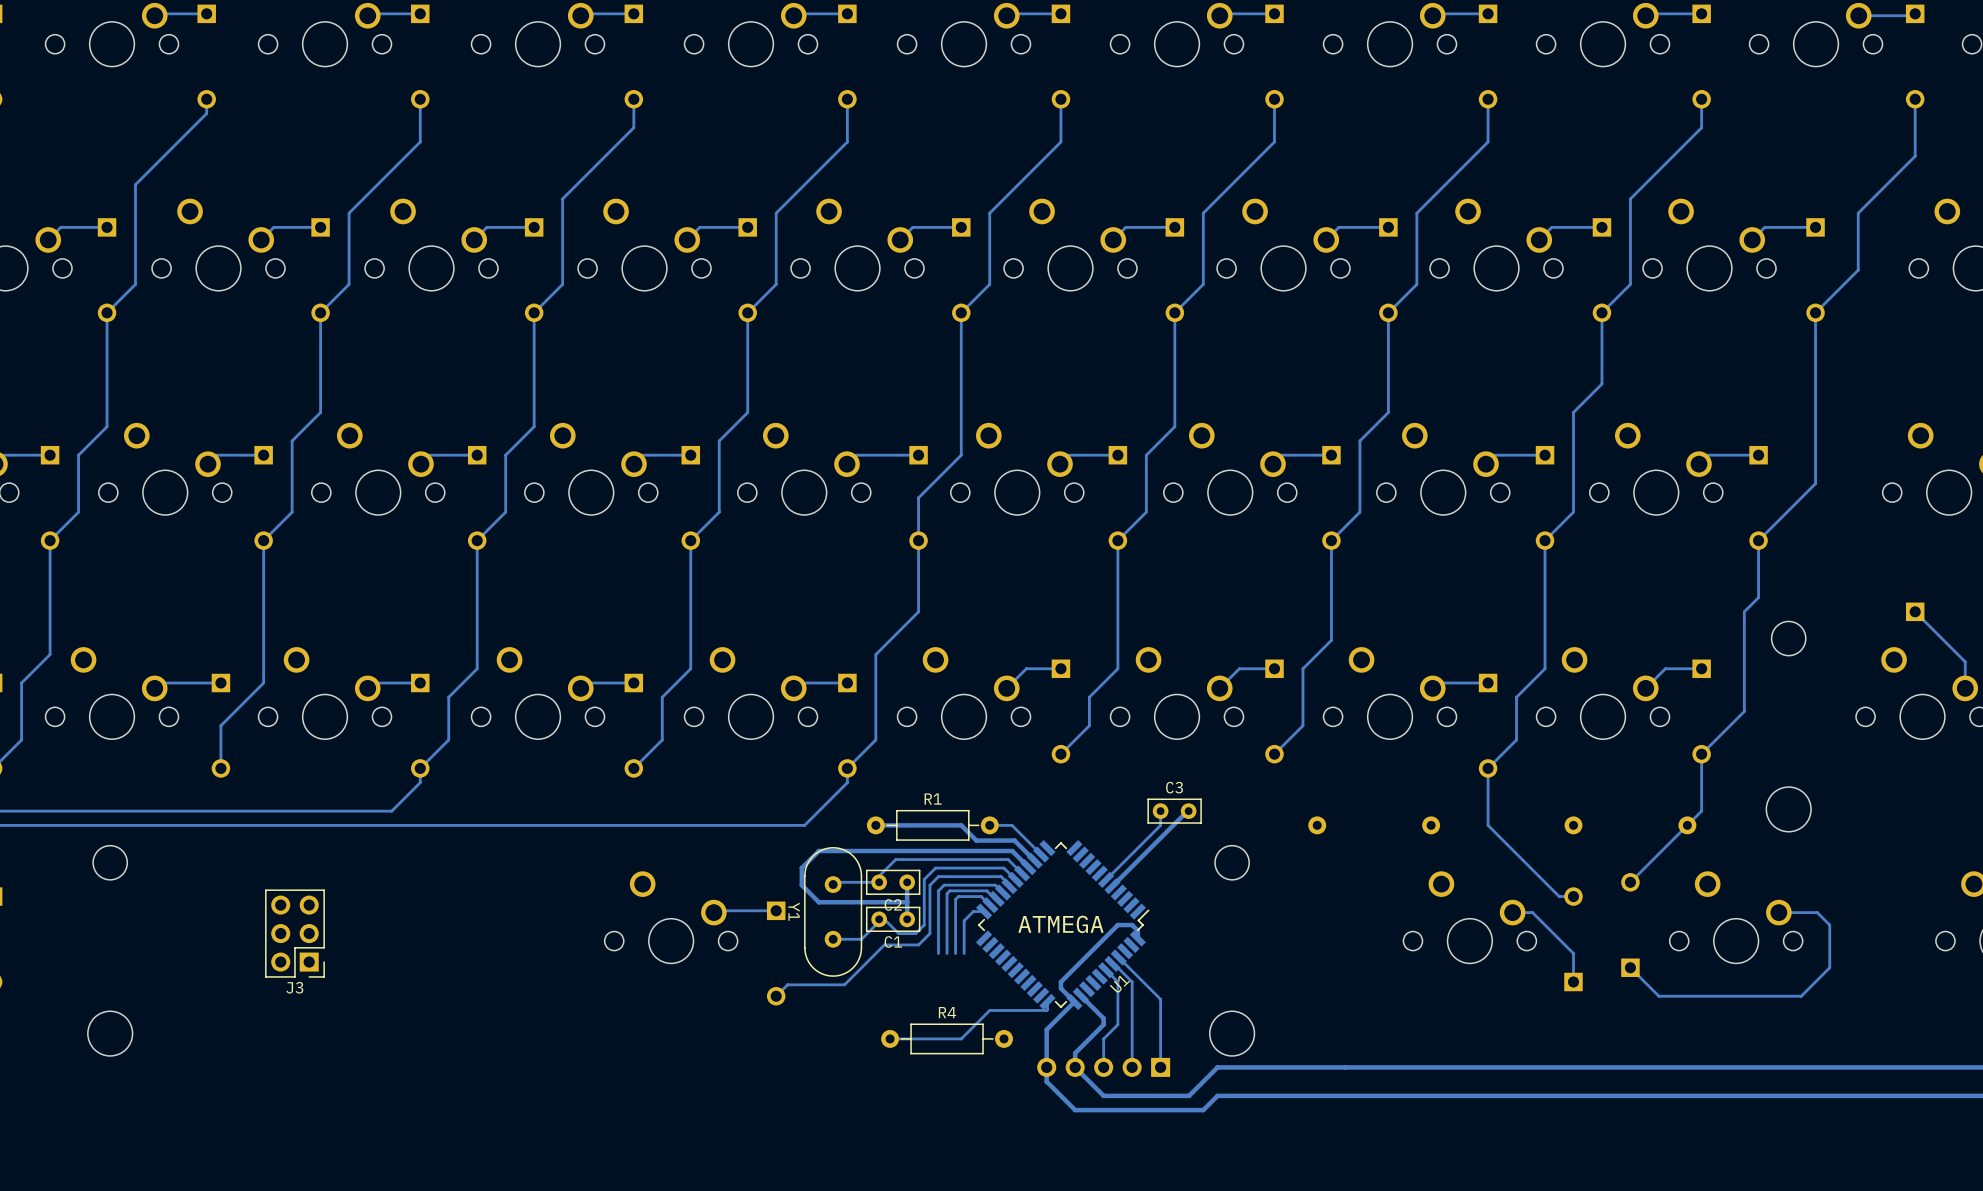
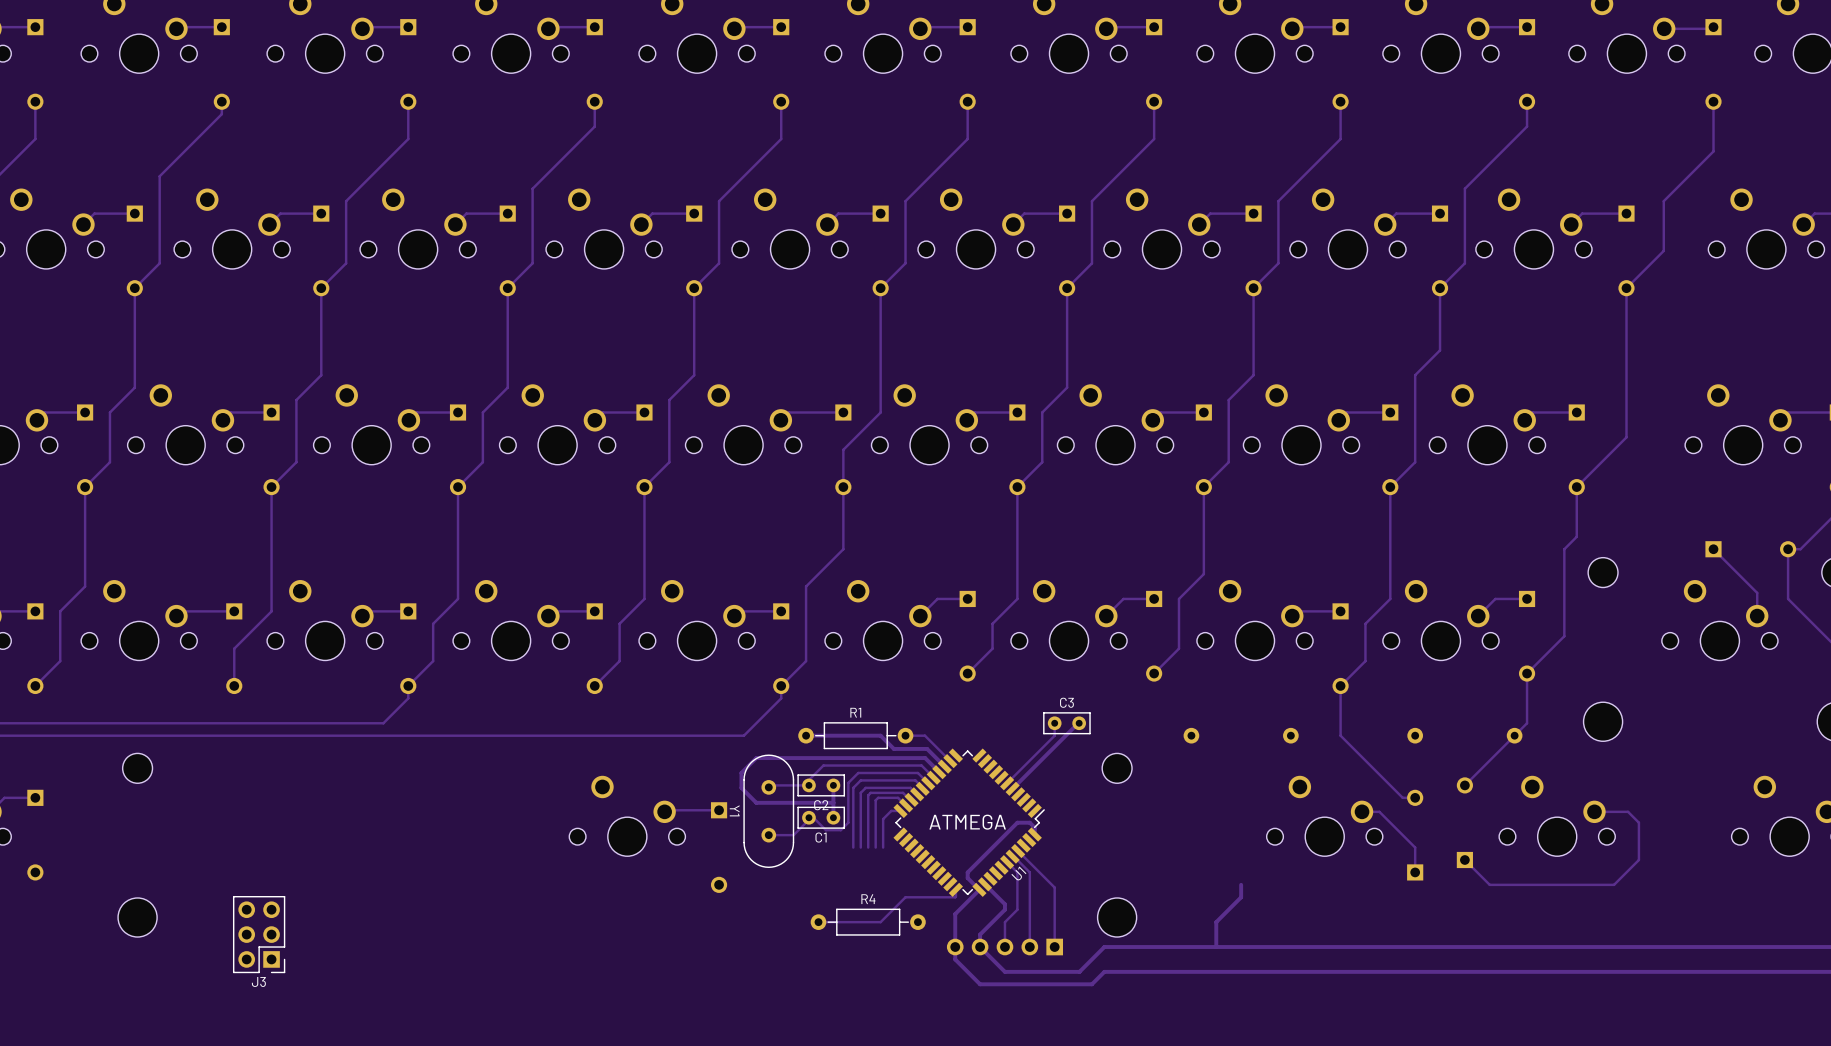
J3 position: (294, 933) -> (259, 934)
track: (929, 933) (918, 944) (884, 944) (844, 984) (787, 984) (776, 996) -> (853, 830) (853, 847)
track: none -> (1241, 884) (1241, 897) (1216, 922) (1216, 947)

